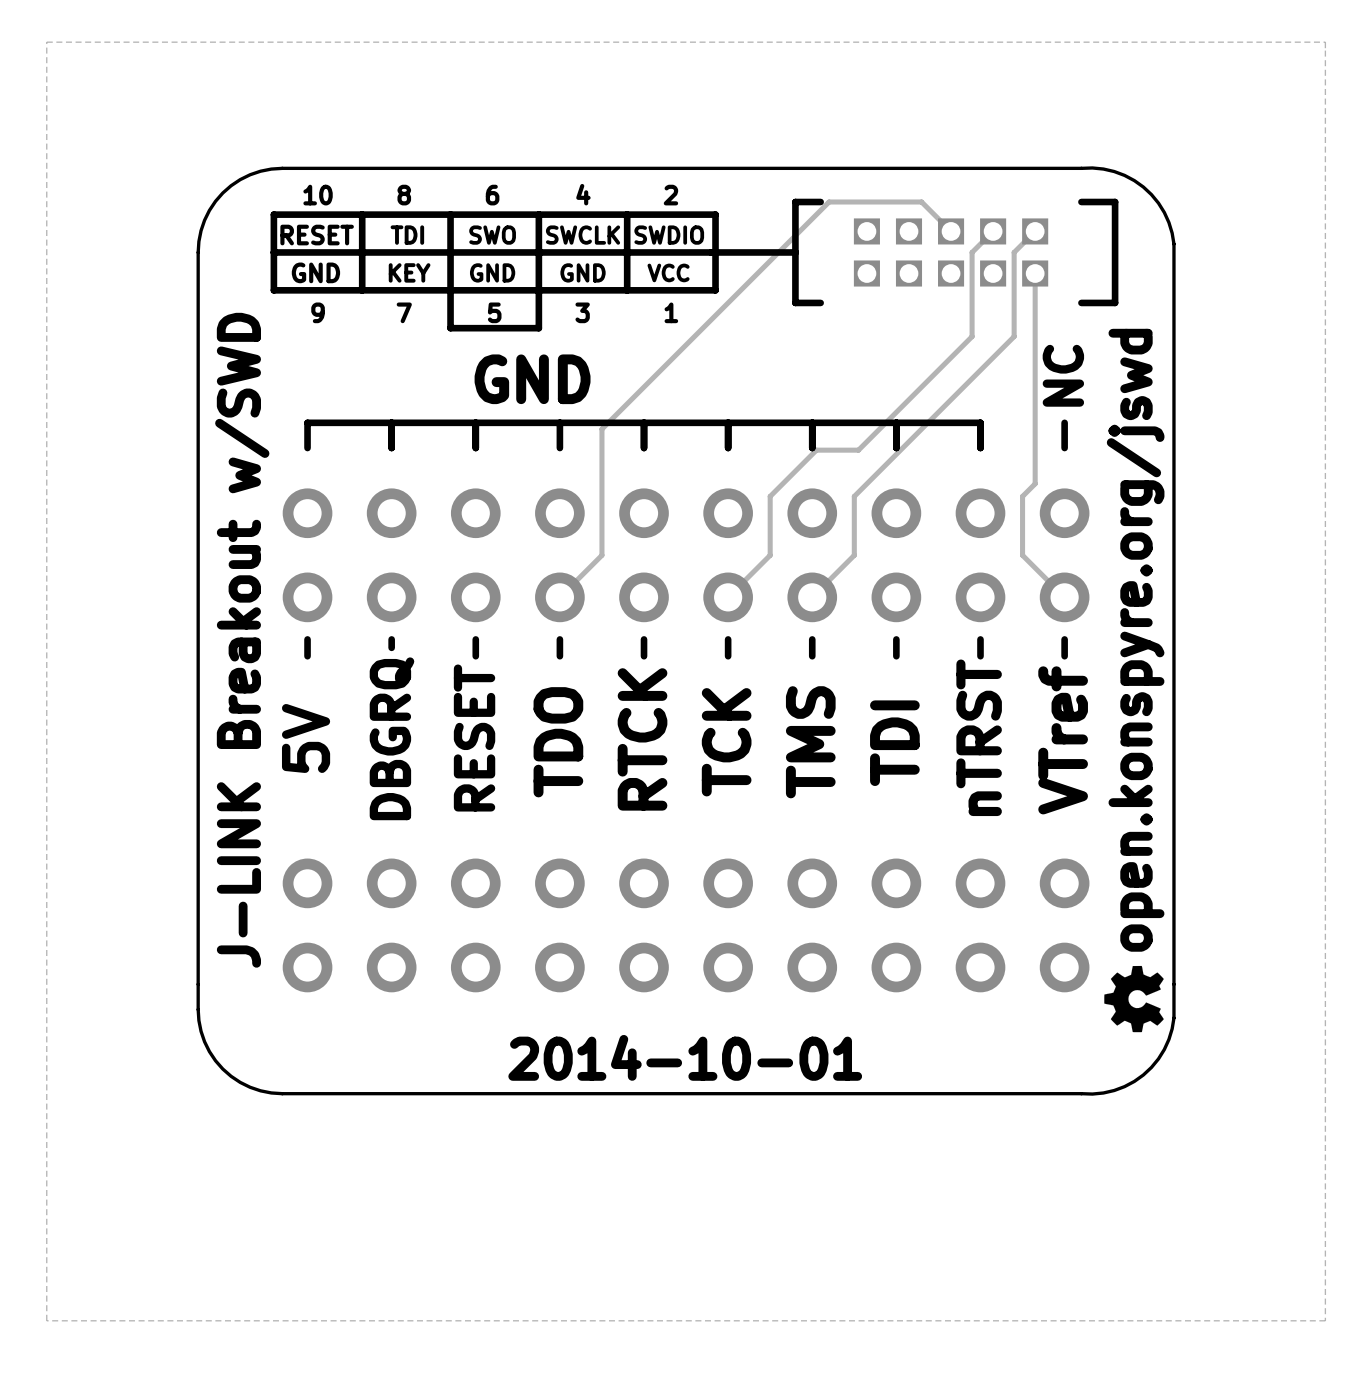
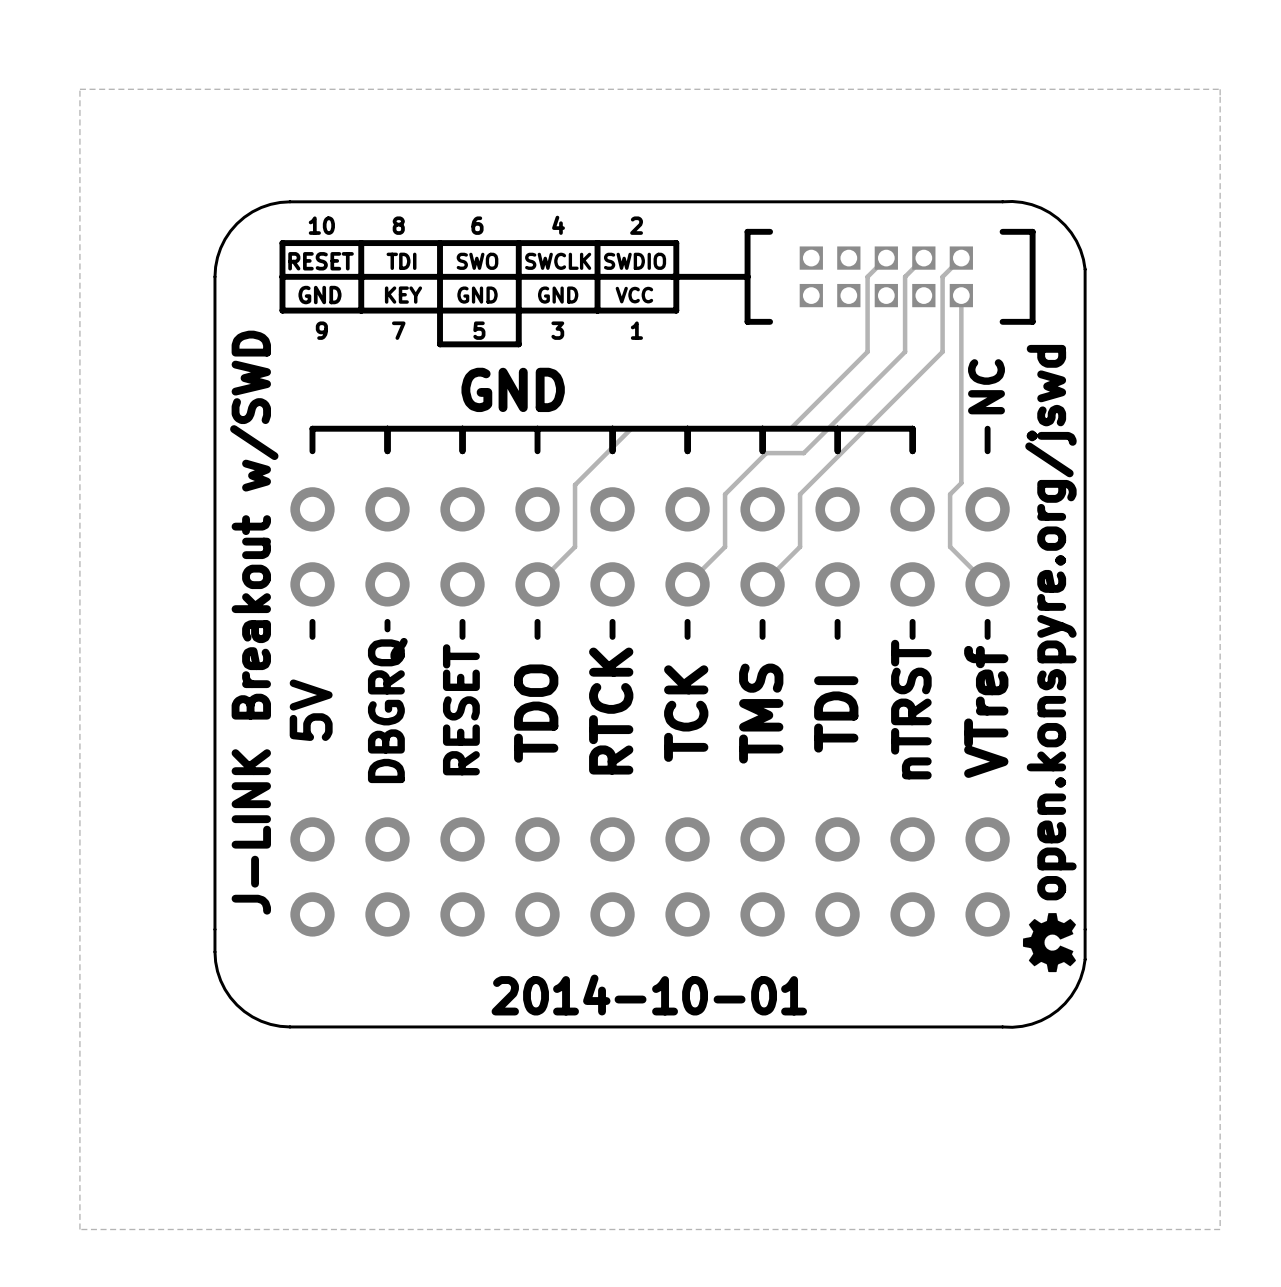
track: (951, 231) (921, 202) (829, 202) (601, 429) (601, 485) -> (886, 258) (867, 276) (867, 351) (790, 428) (631, 428) (575, 484)

